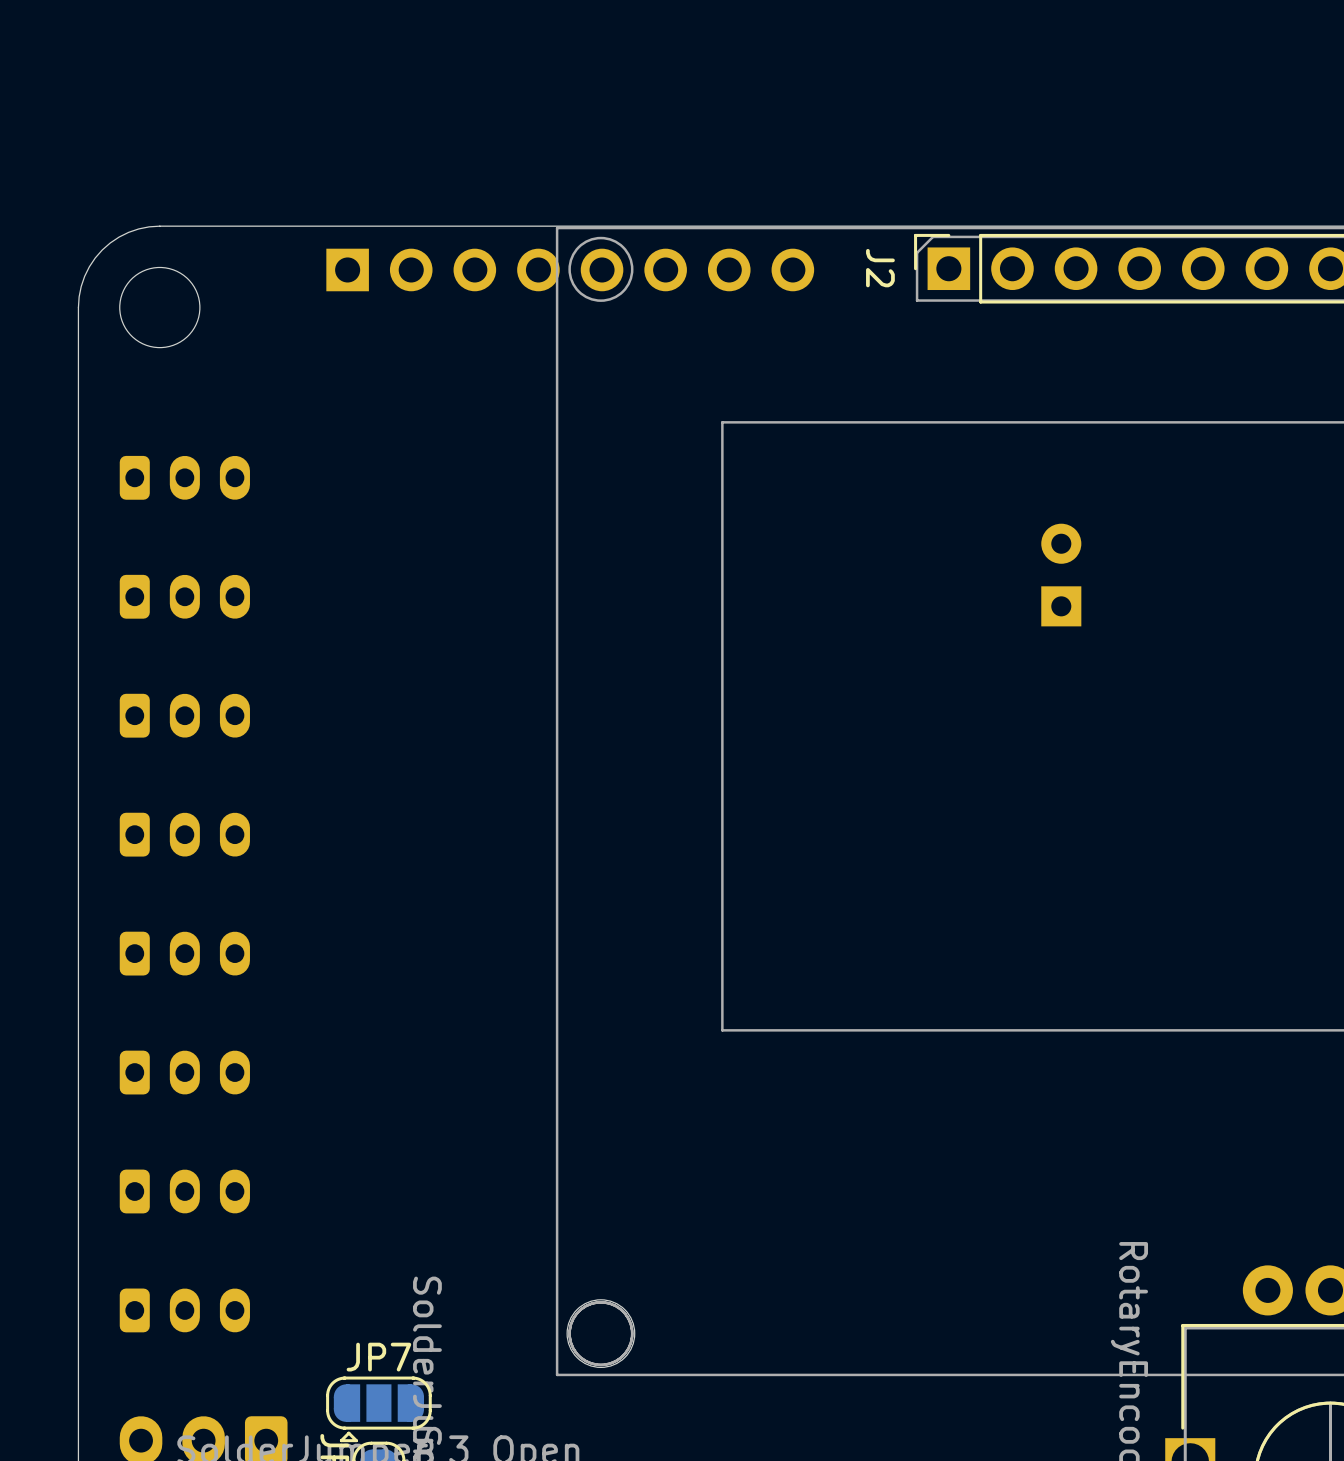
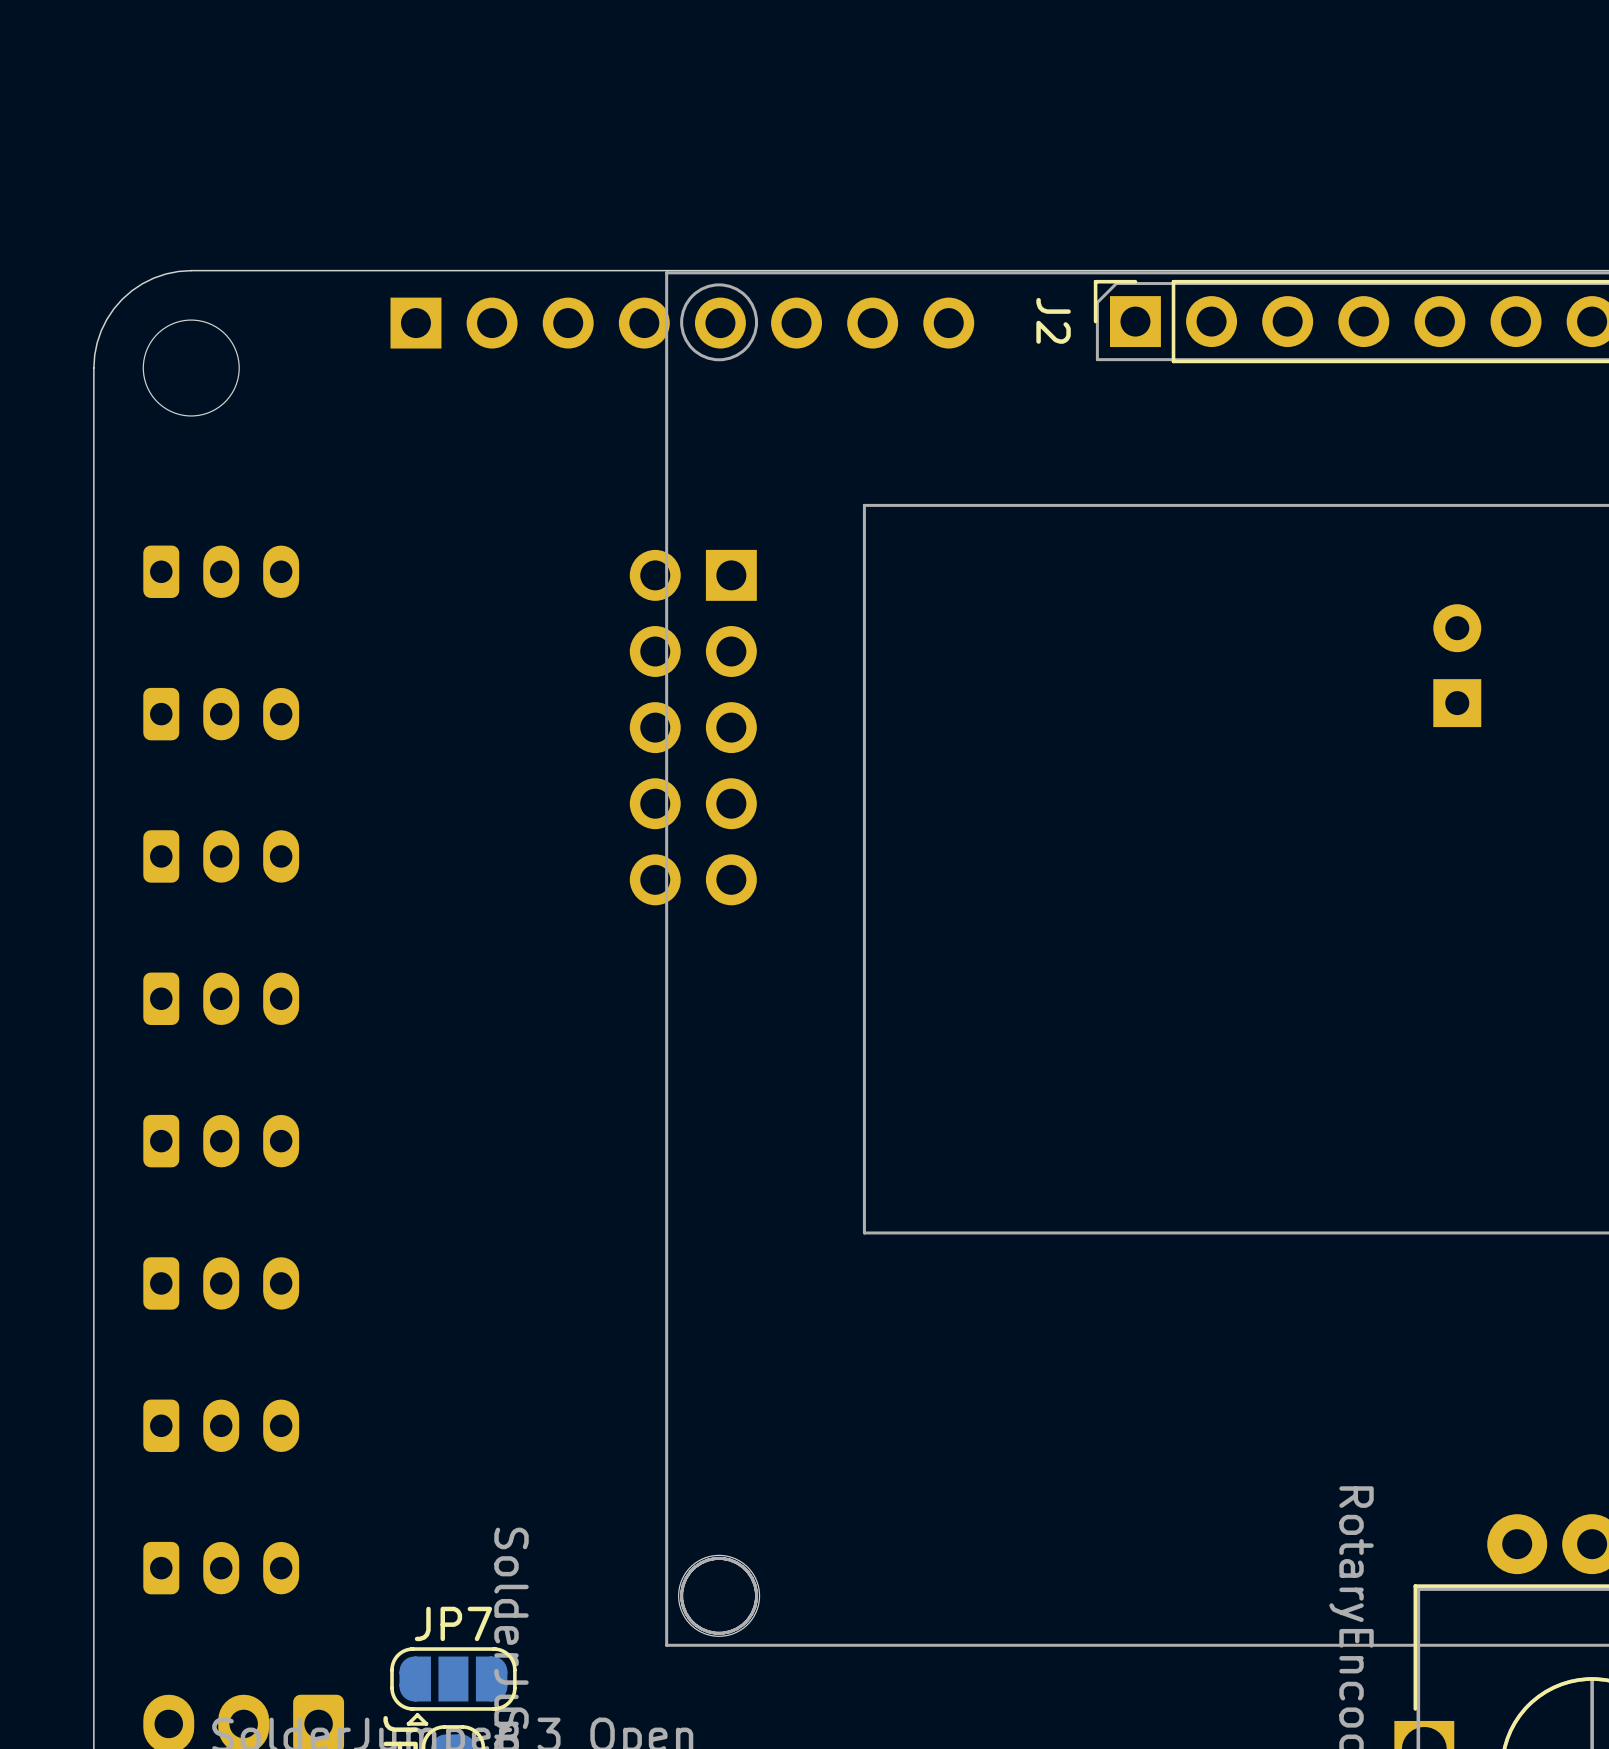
part position: (1061, 575) -> (1457, 665)
part: none -> (693, 727)

